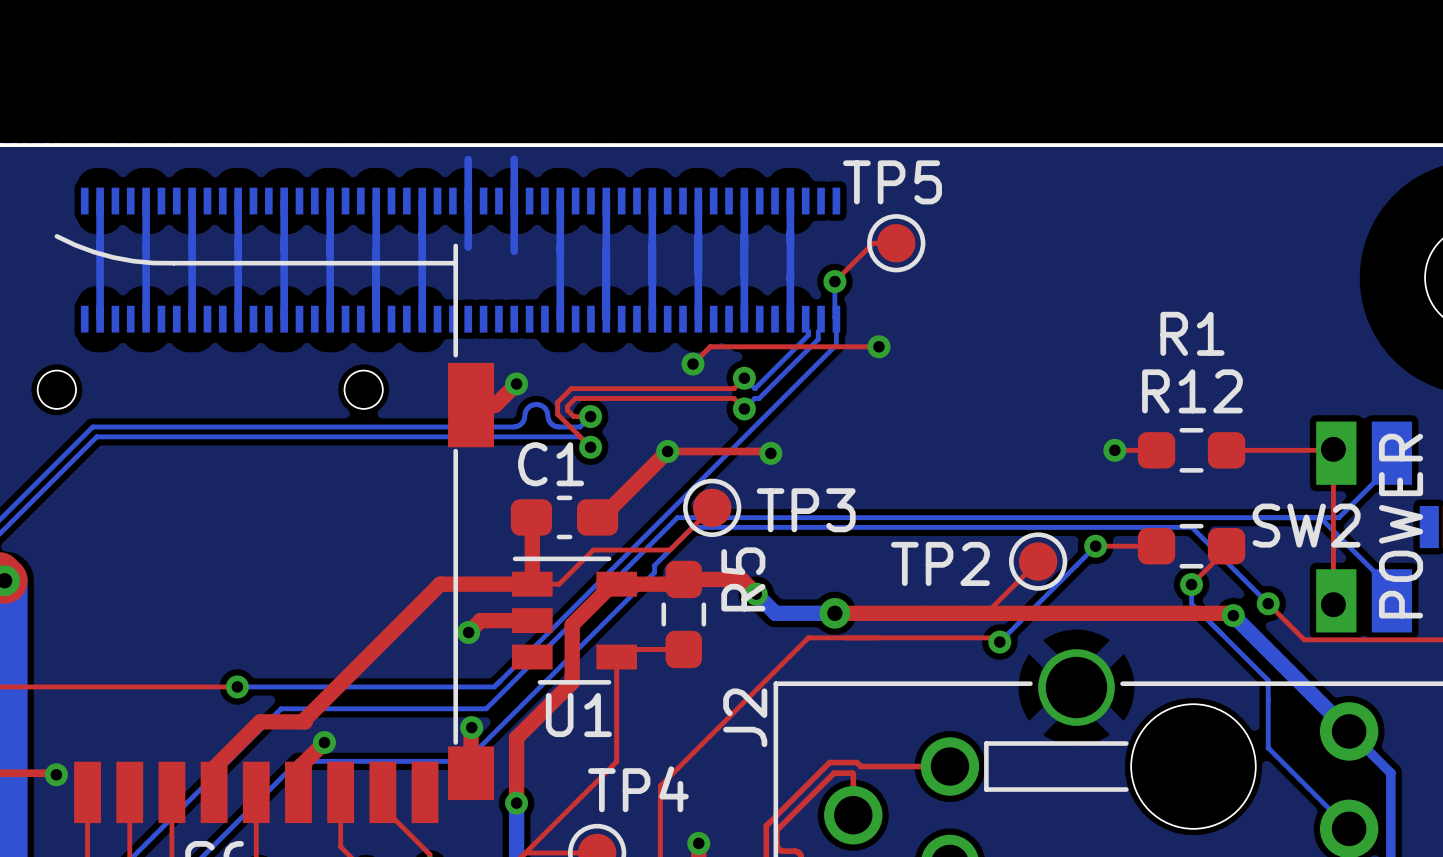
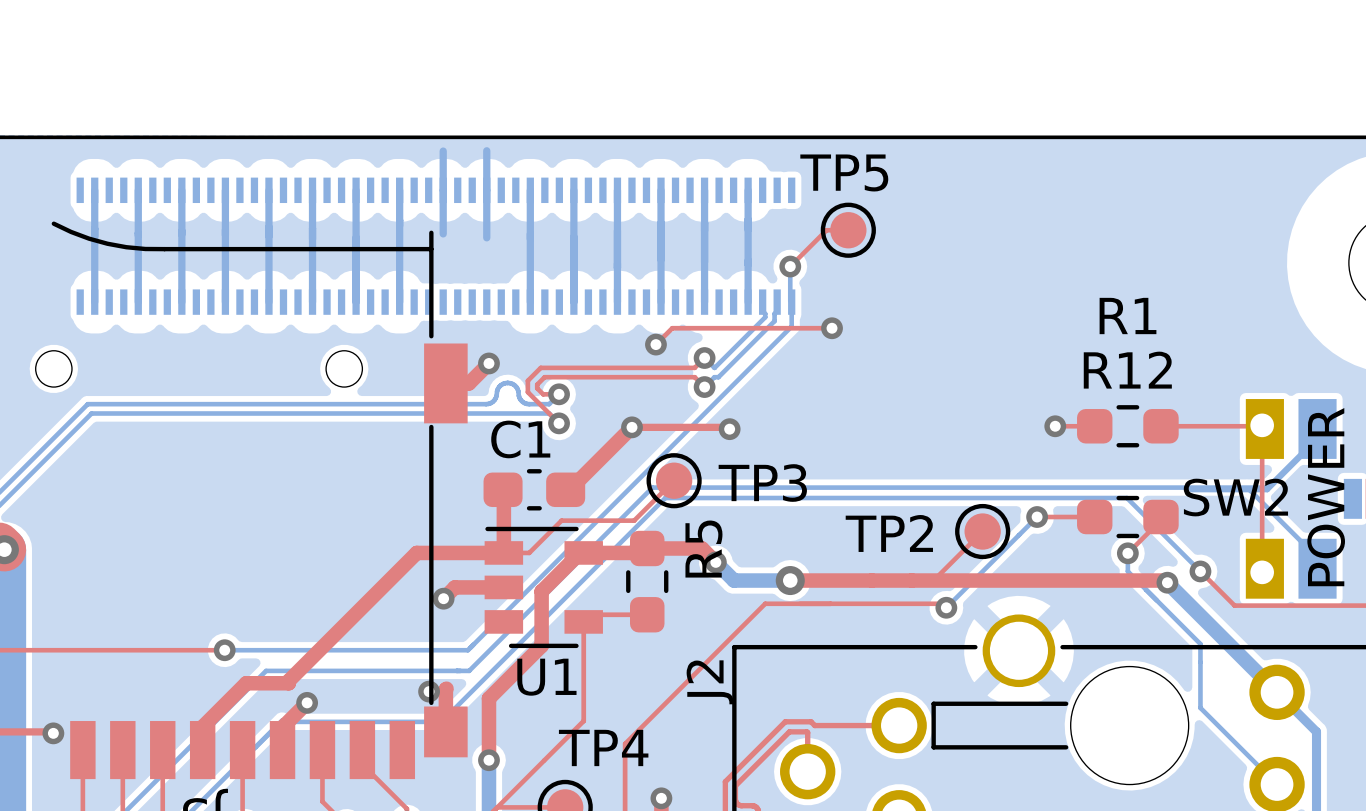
bottom track: (1335, 517) (677, 517) (486, 708) -> (1317, 428) (1317, 437) (1267, 487) (652, 487) (469, 670) (460, 670)
bottom track: (1191, 527) (692, 527) (654, 565) (654, 572) (465, 761) (299, 761) -> (1128, 499) (665, 498) (441, 721) (280, 721) (255, 747)
via position: (471, 727) -> (429, 691)

